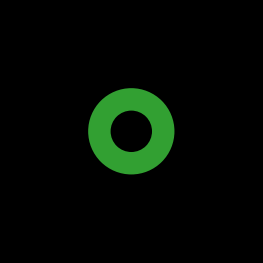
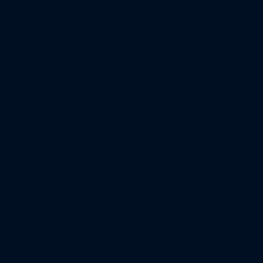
part: (131, 131) -> none

